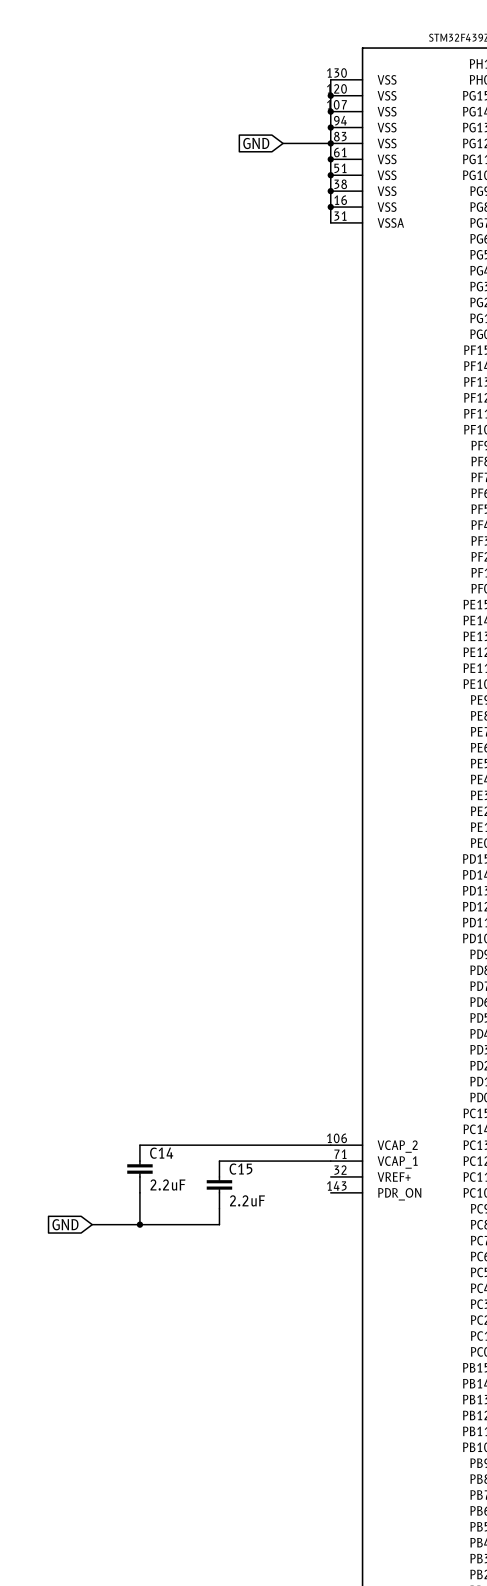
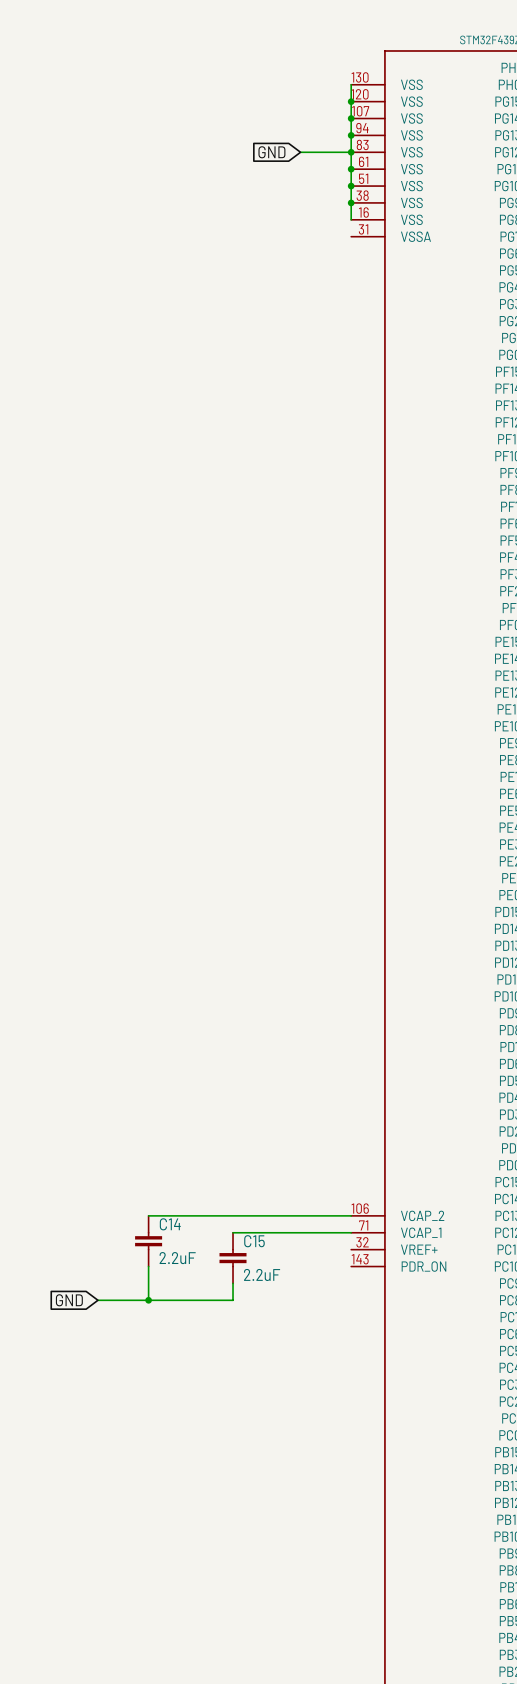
wire: (330, 207) (330, 222) -> none
junction: (330, 207) -> none

